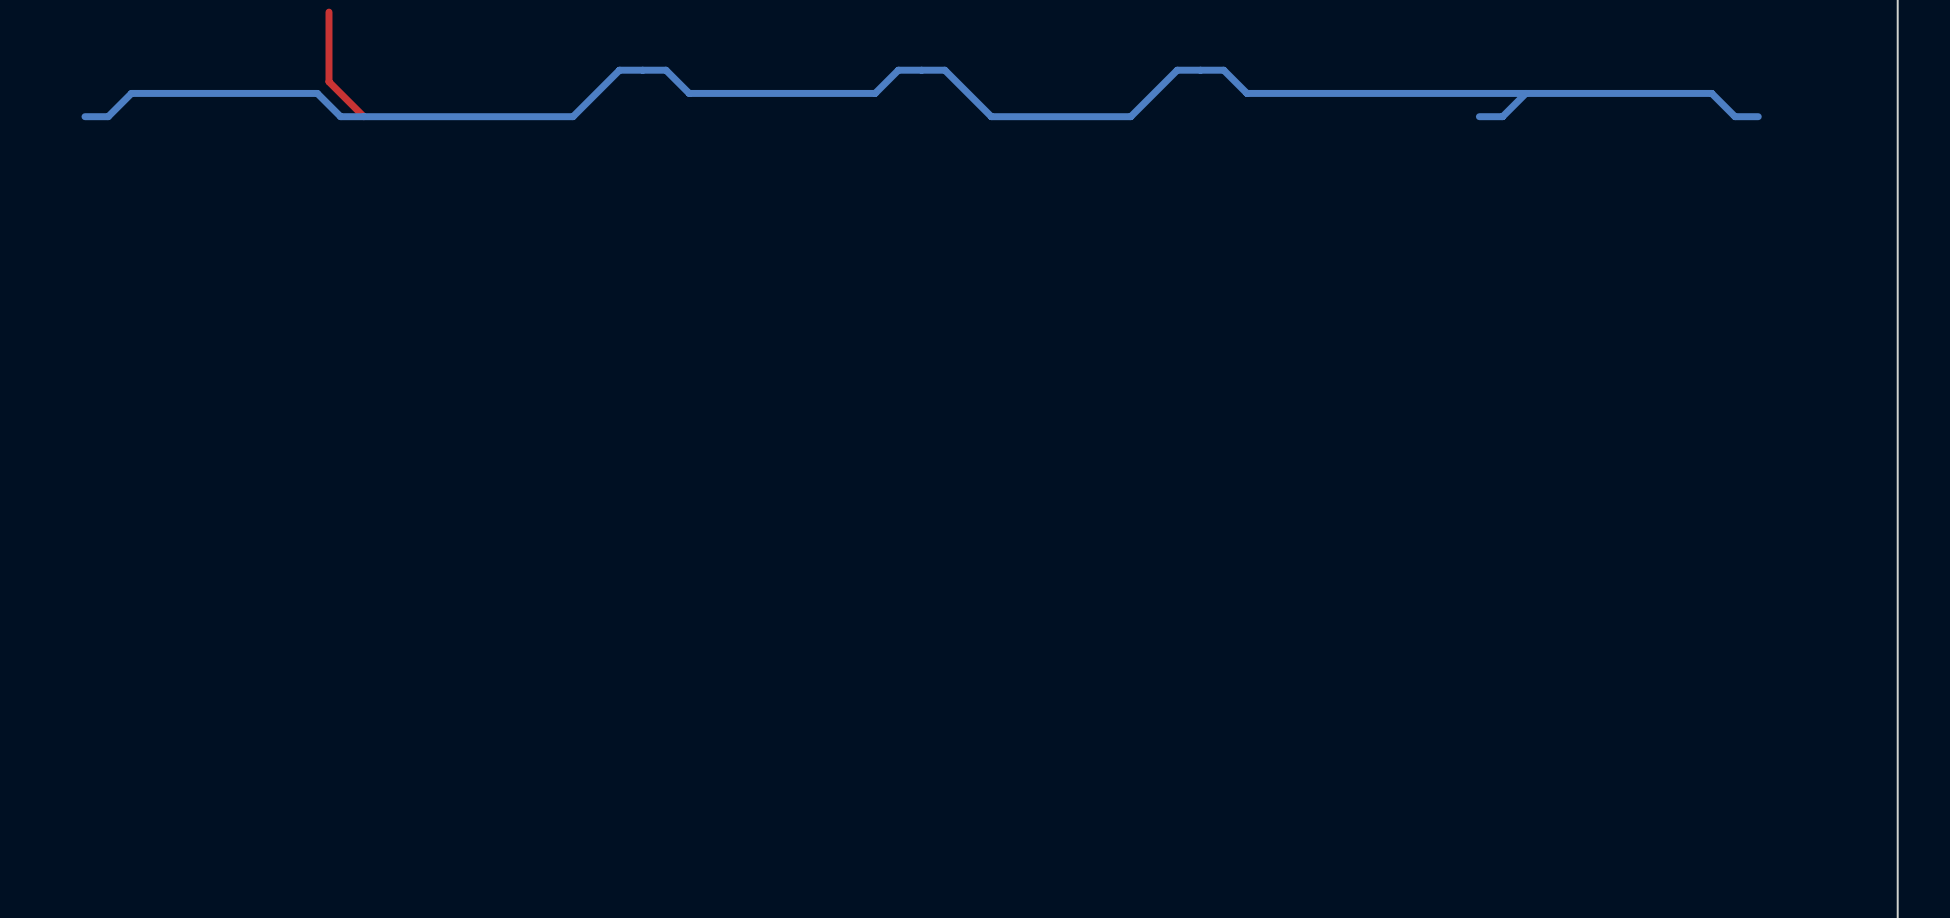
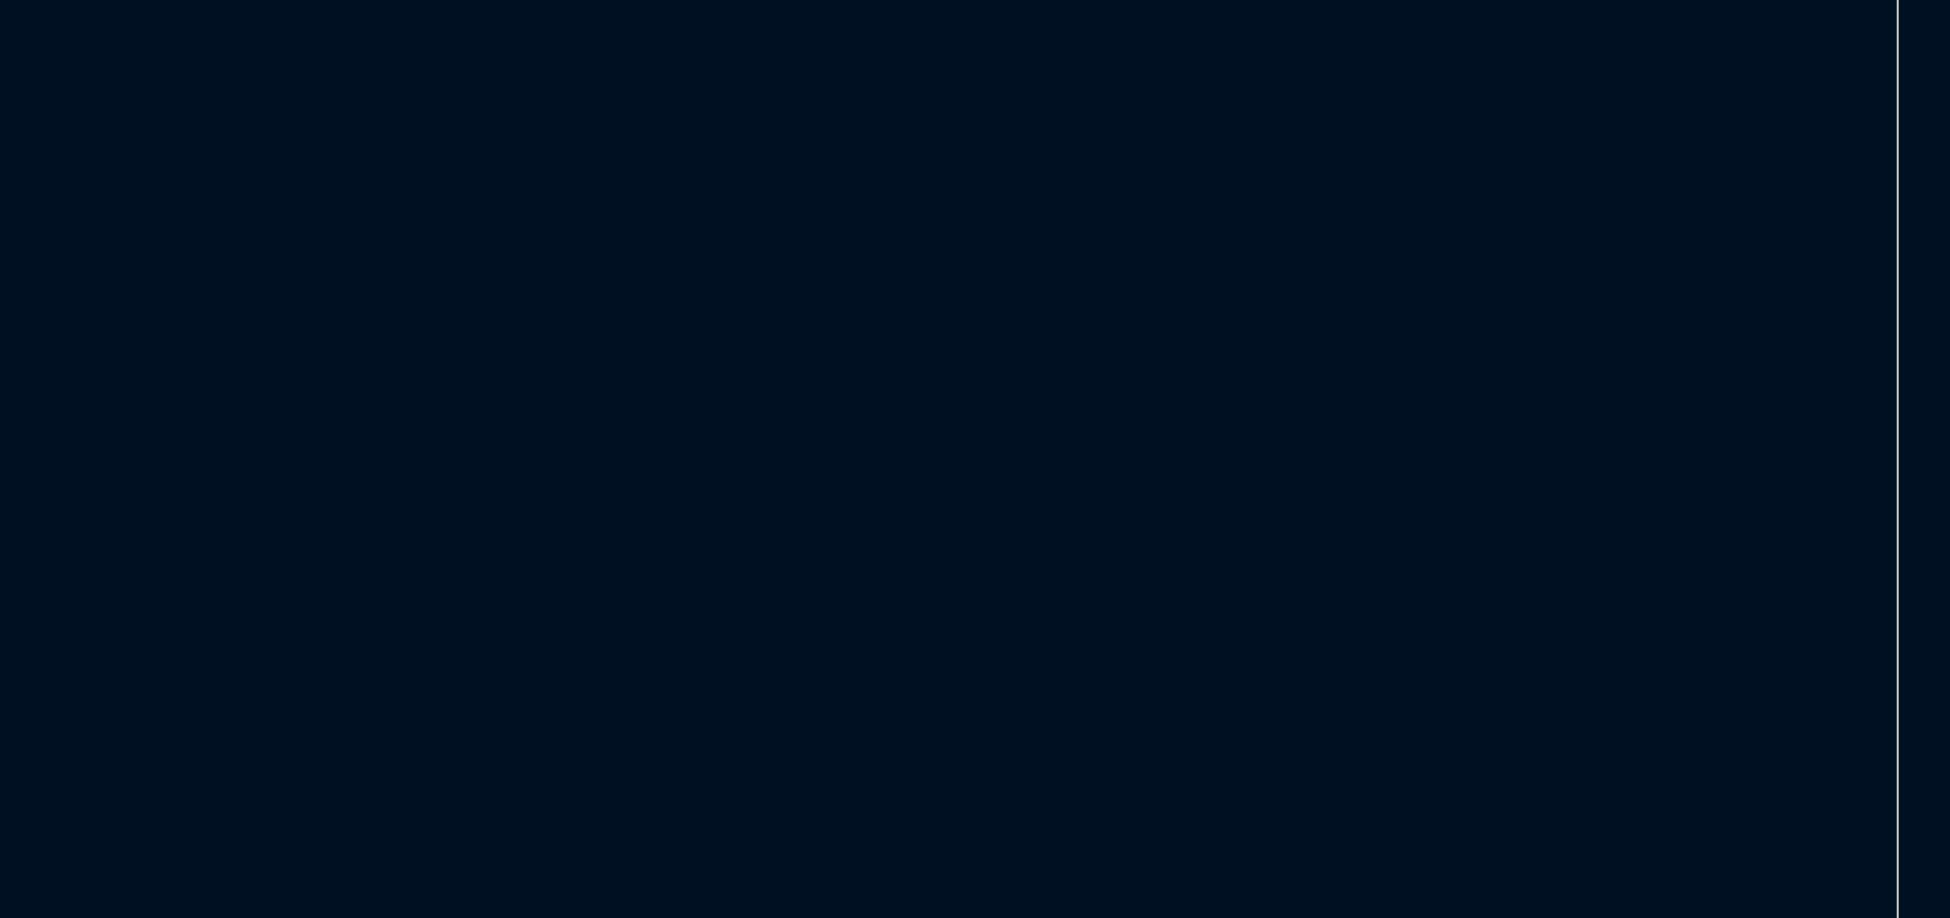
top track: (328, 12) (328, 81) (363, 116) -> none
bottom track: (1525, 93) (1502, 116) (1479, 116) -> none
bottom track: (1758, 116) (1735, 116) (1711, 93) (1246, 93) (1223, 70) (1177, 70) (1130, 116) (991, 116) (944, 70) (898, 70) (875, 93) (689, 93) (665, 70) (619, 70) (573, 116) (340, 116) (317, 93) (131, 93) (108, 116) (84, 116) -> none

